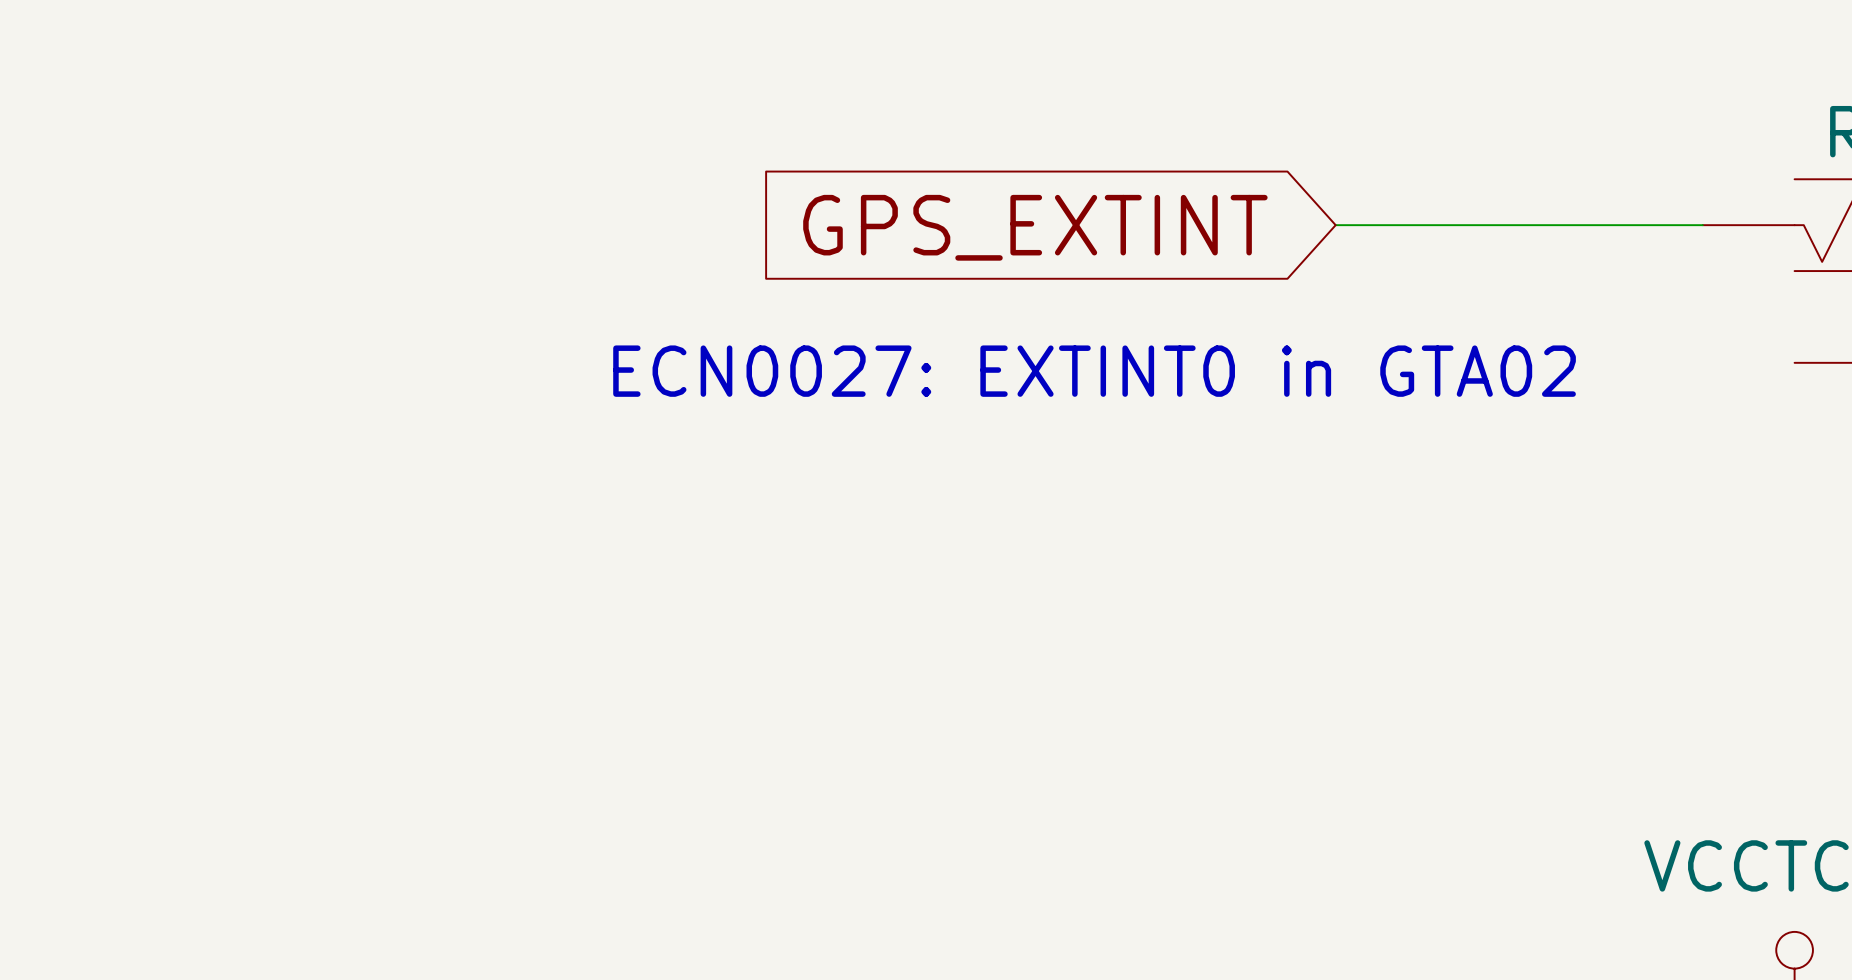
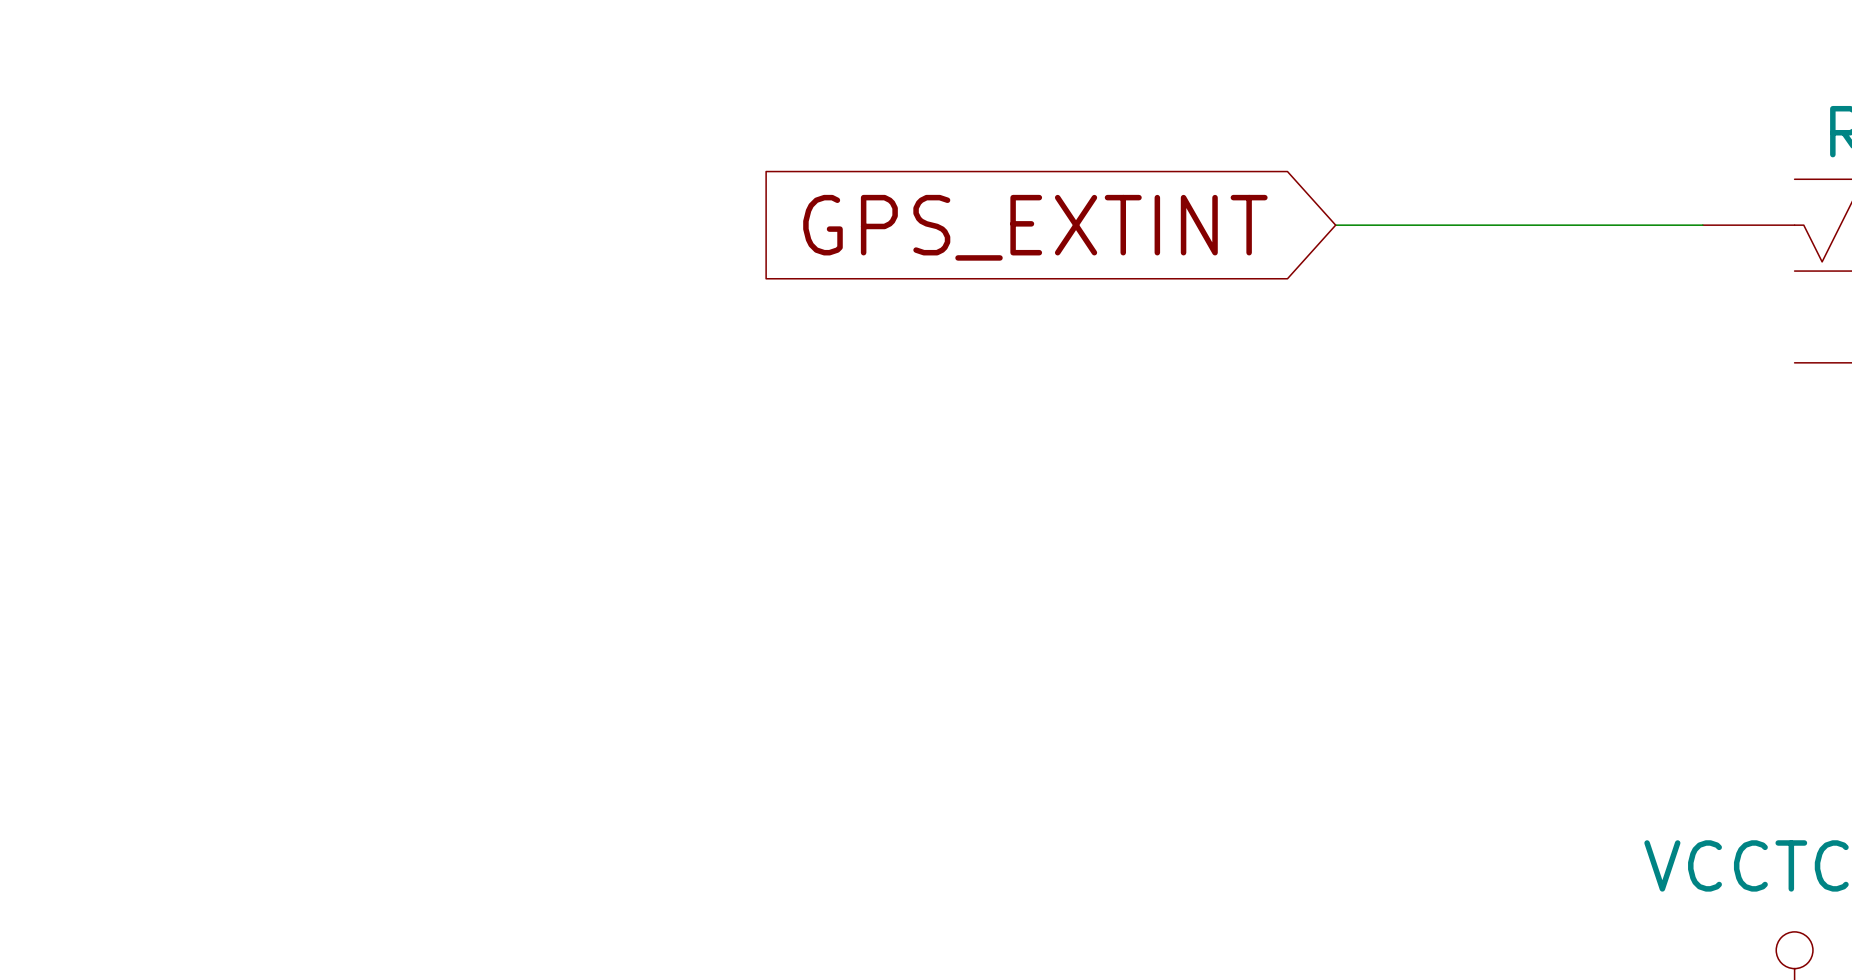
text: ECN0027: EXTINT0 in GTA02 (1094, 371) -> none

